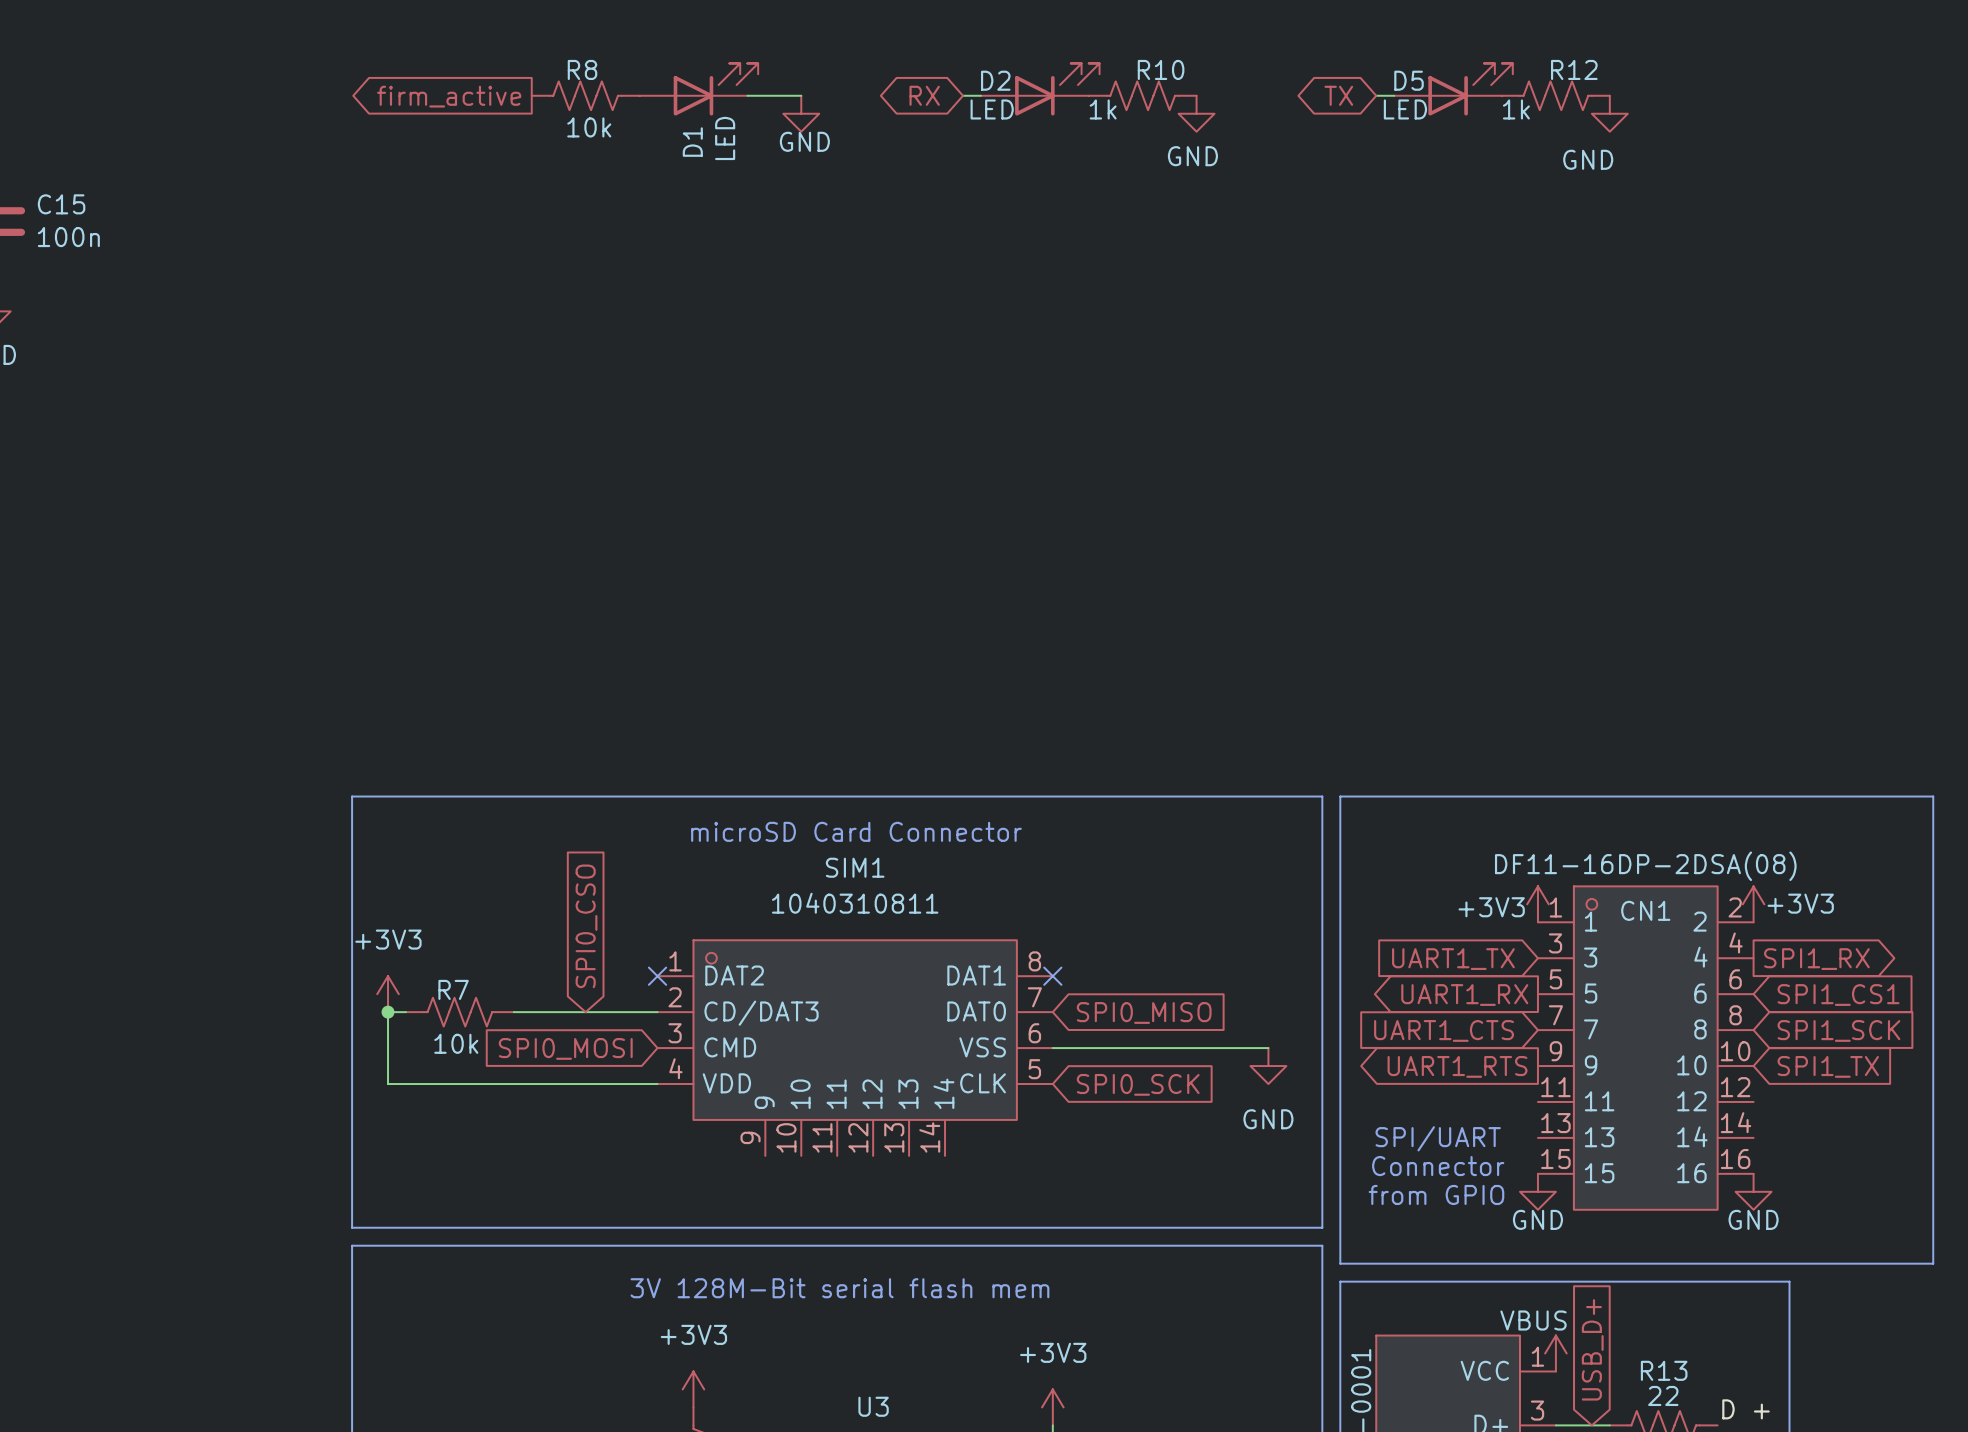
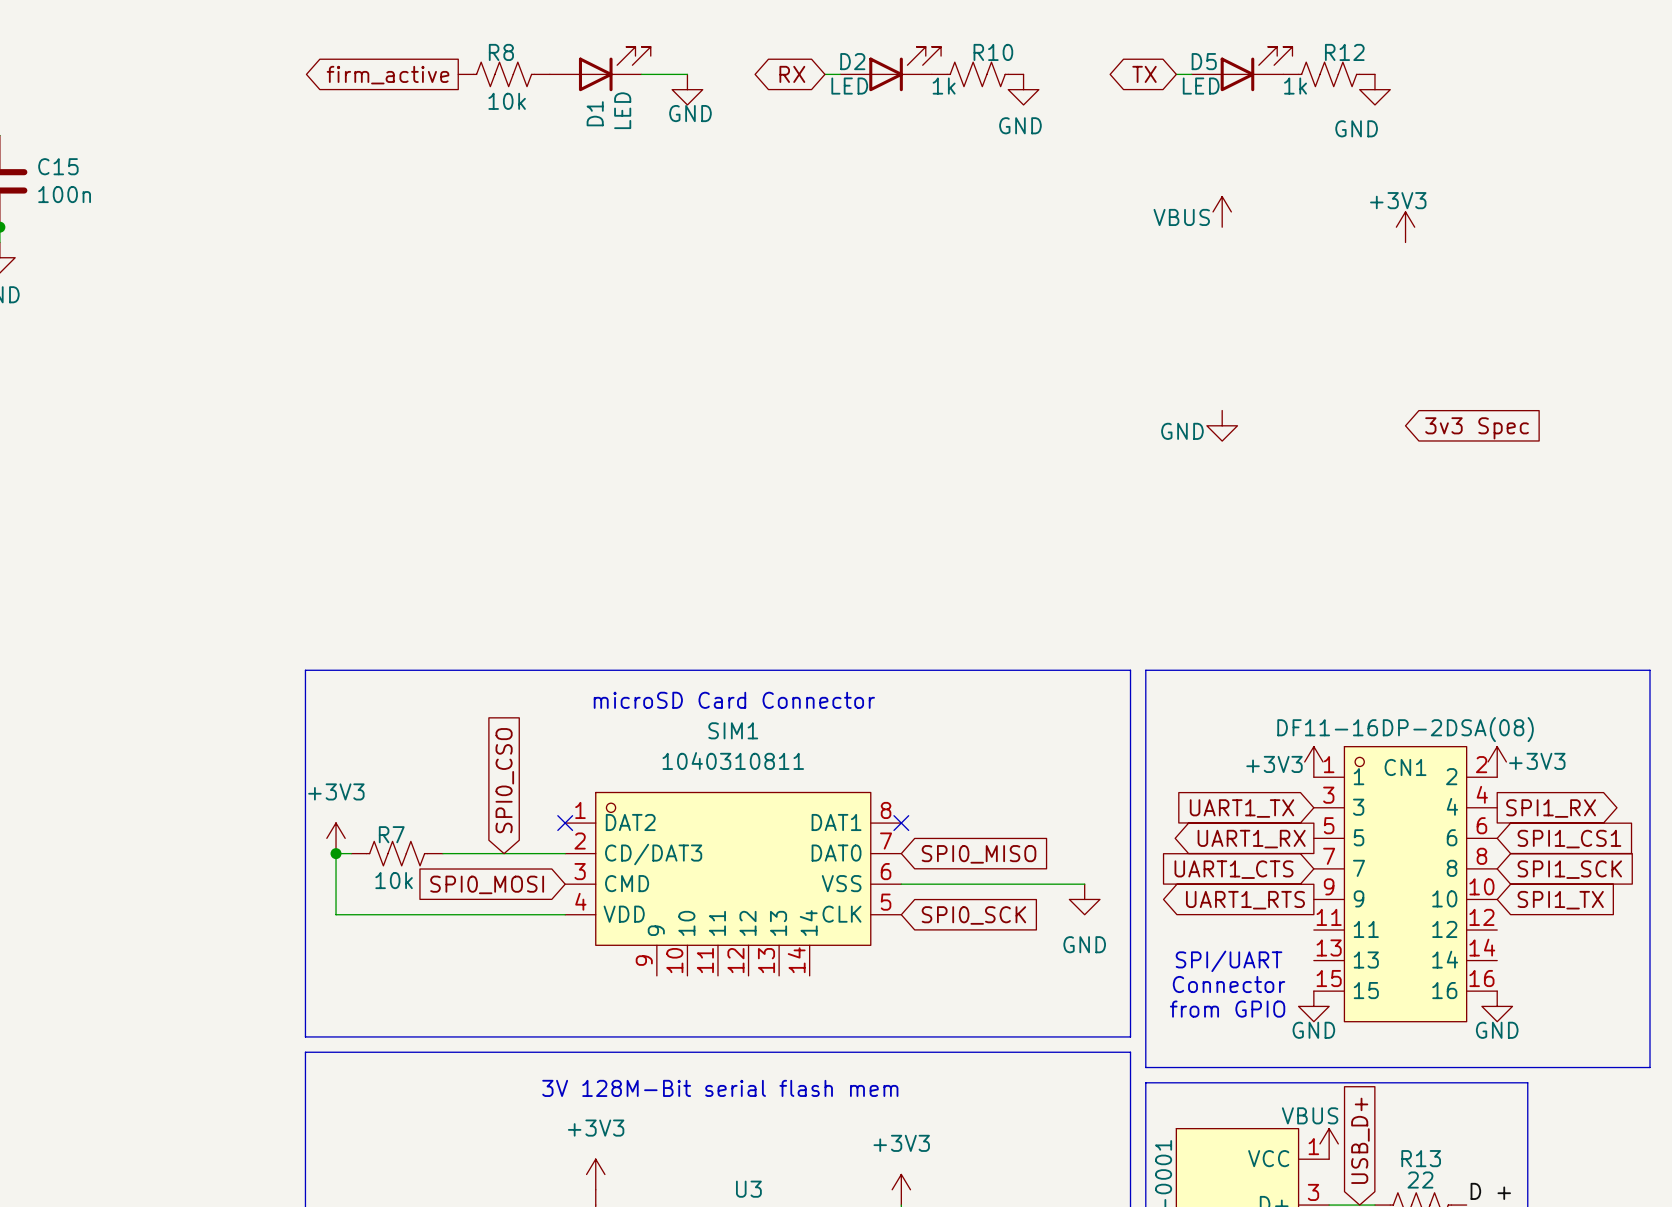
power symbol: none -> VBUS (1222, 211)
power symbol: none -> +3V3 (1405, 227)
power symbol: none -> GND (1222, 425)
global label: none -> 3v3 Spec (1477, 428)

